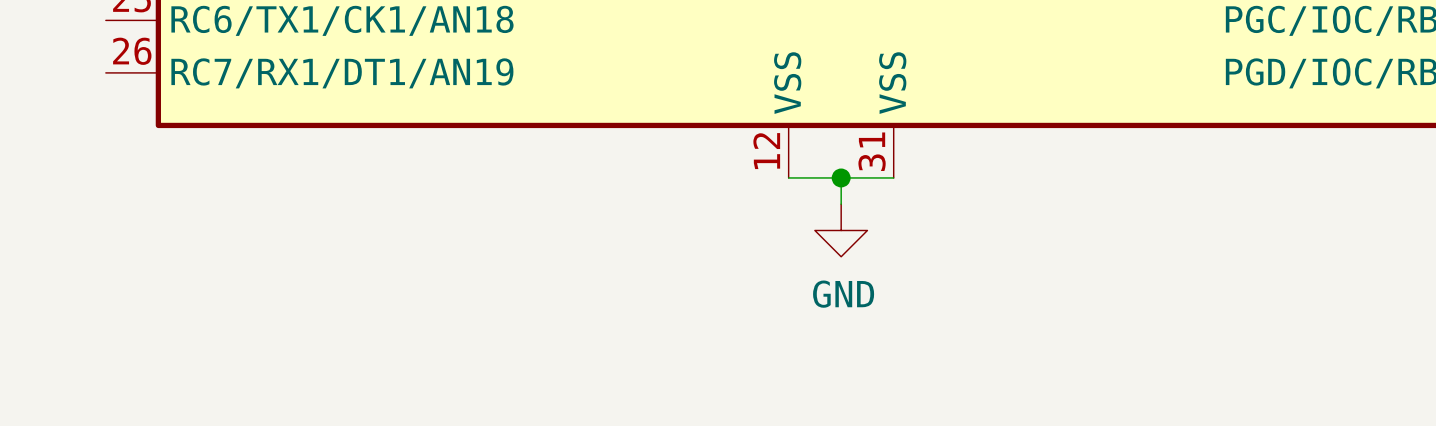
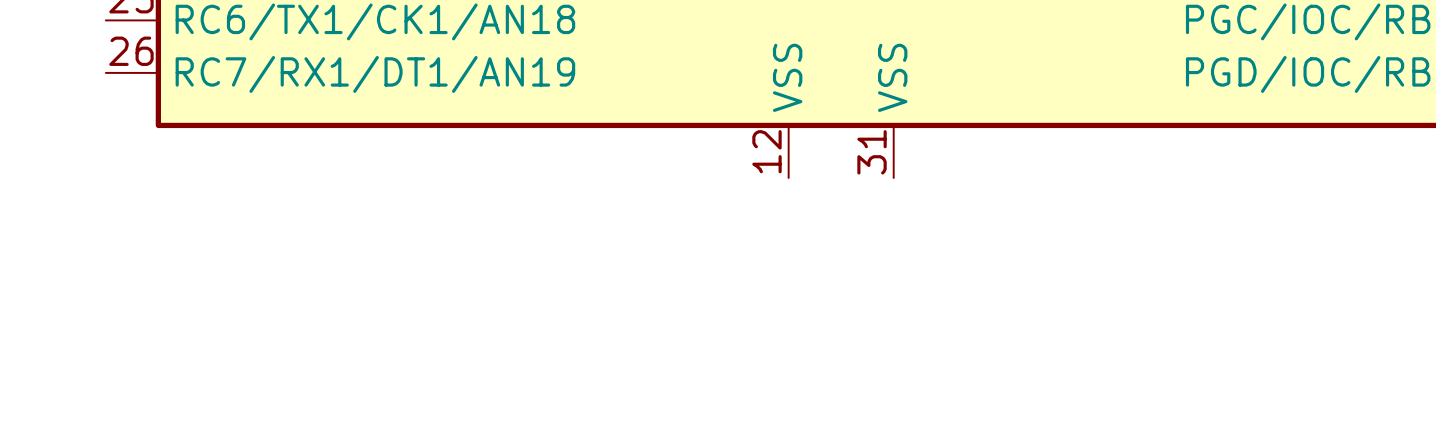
wire: (788, 177) (893, 177) -> none
wire: (841, 177) (841, 204) -> none
junction: (841, 177) -> none
power symbol: GND (841, 230) -> none

